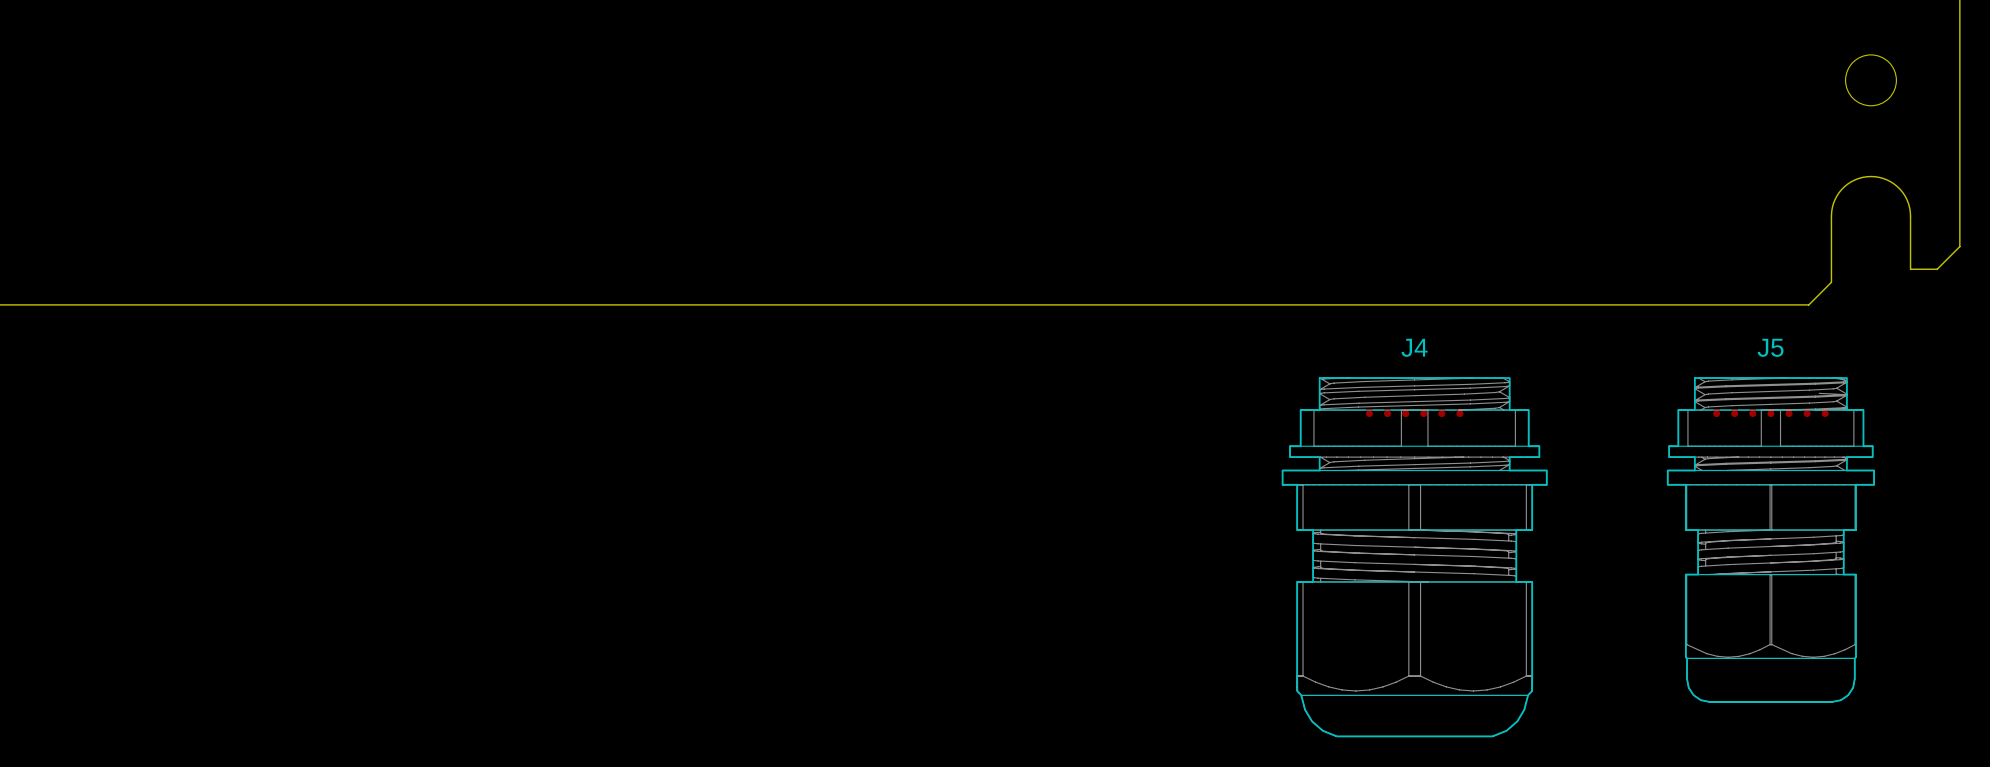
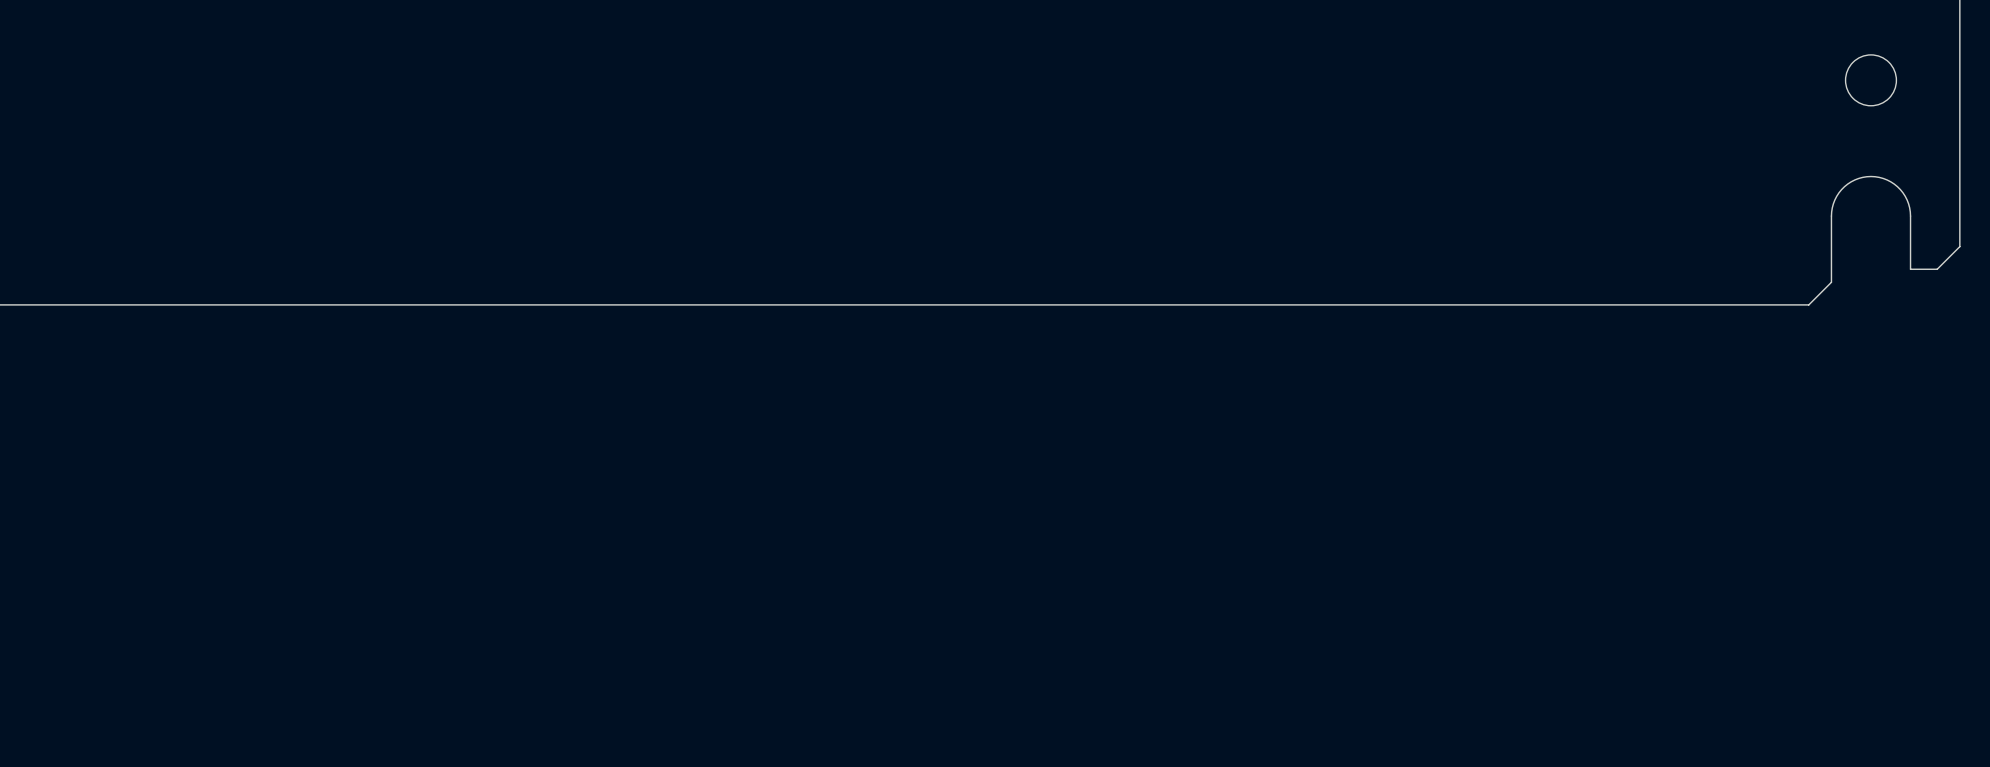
J5: (1770, 539) -> none
J4: (1414, 557) -> none

